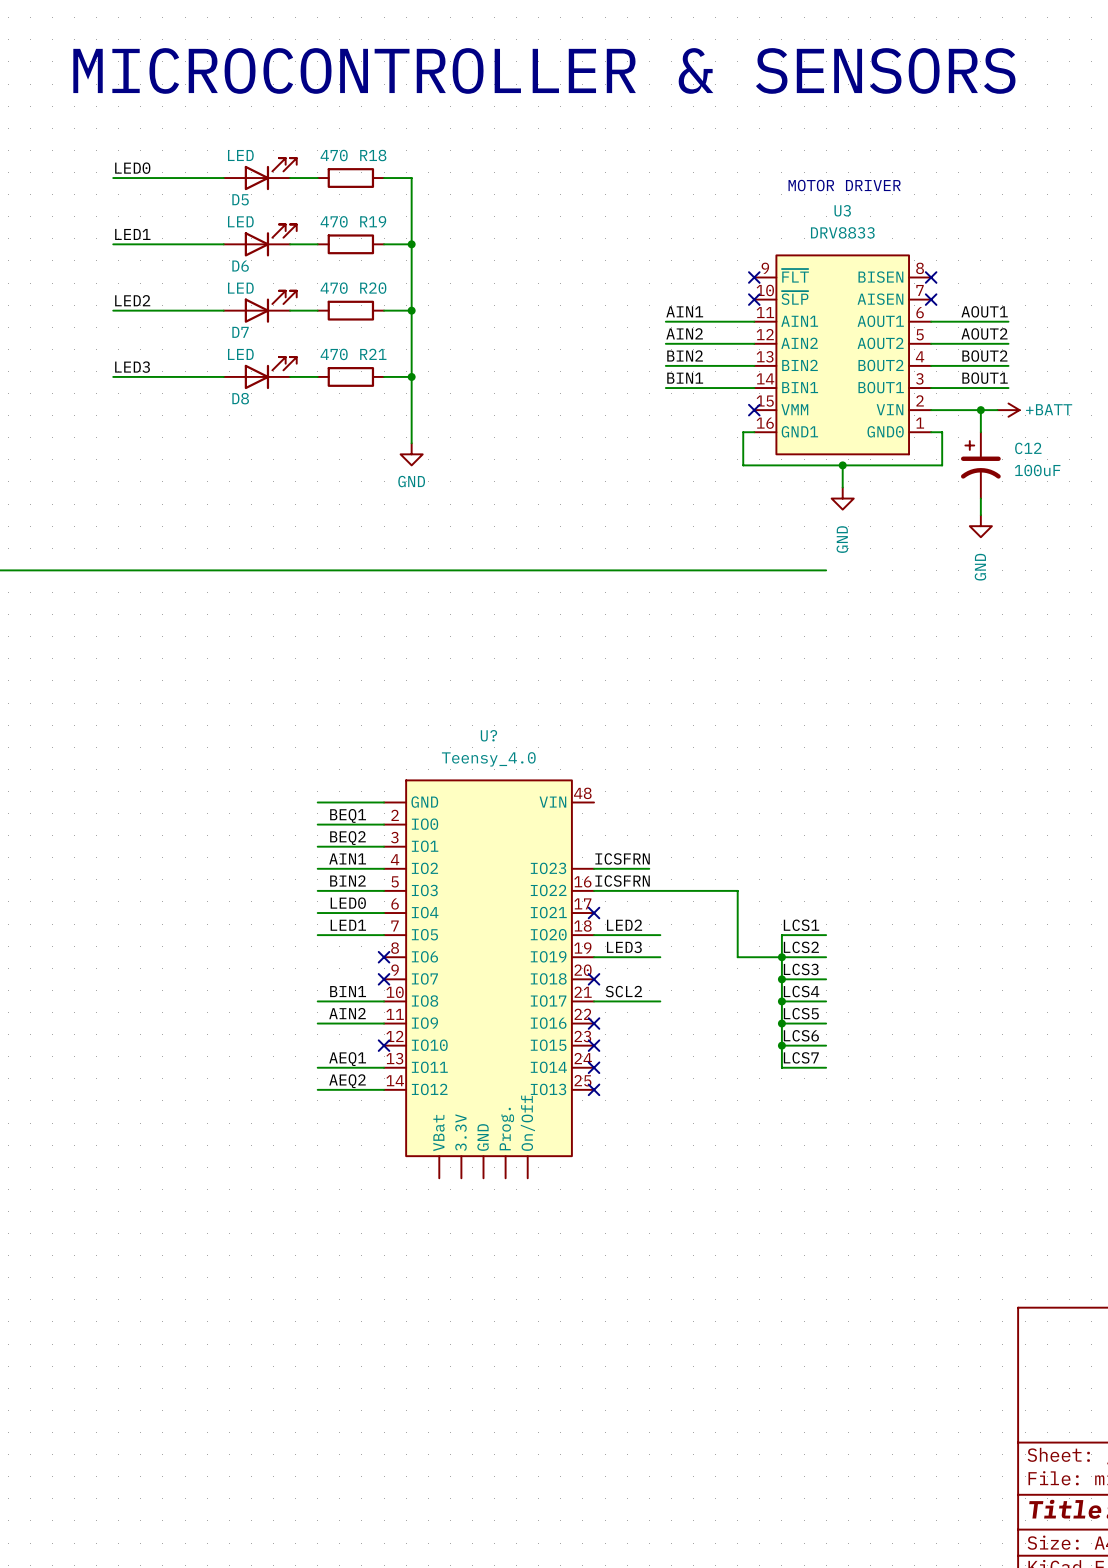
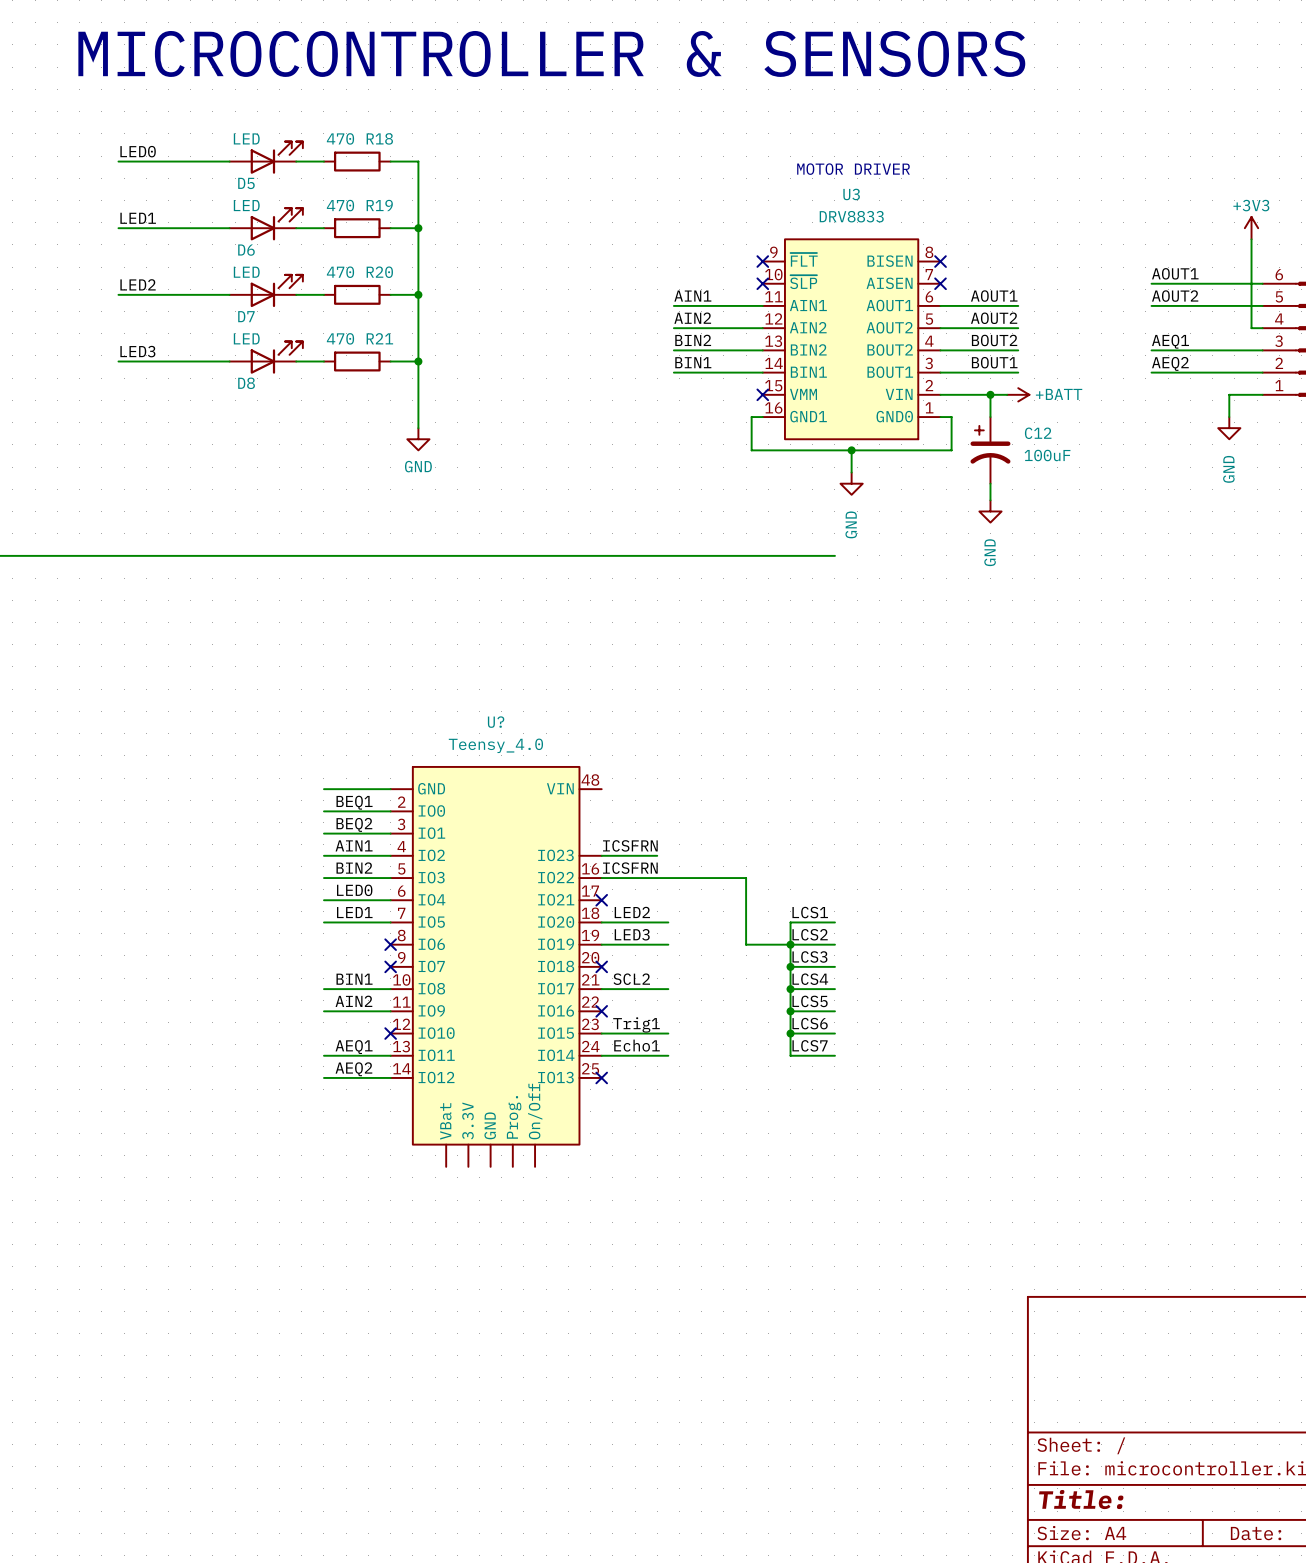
label: none -> Trig1 (636, 1024)
wire: none -> (601, 1033) (668, 1033)
no-connect mark: (594, 1045) -> none
label: none -> Echo1 (637, 1045)
wire: none -> (601, 1055) (668, 1055)
no-connect mark: (594, 1067) -> none

